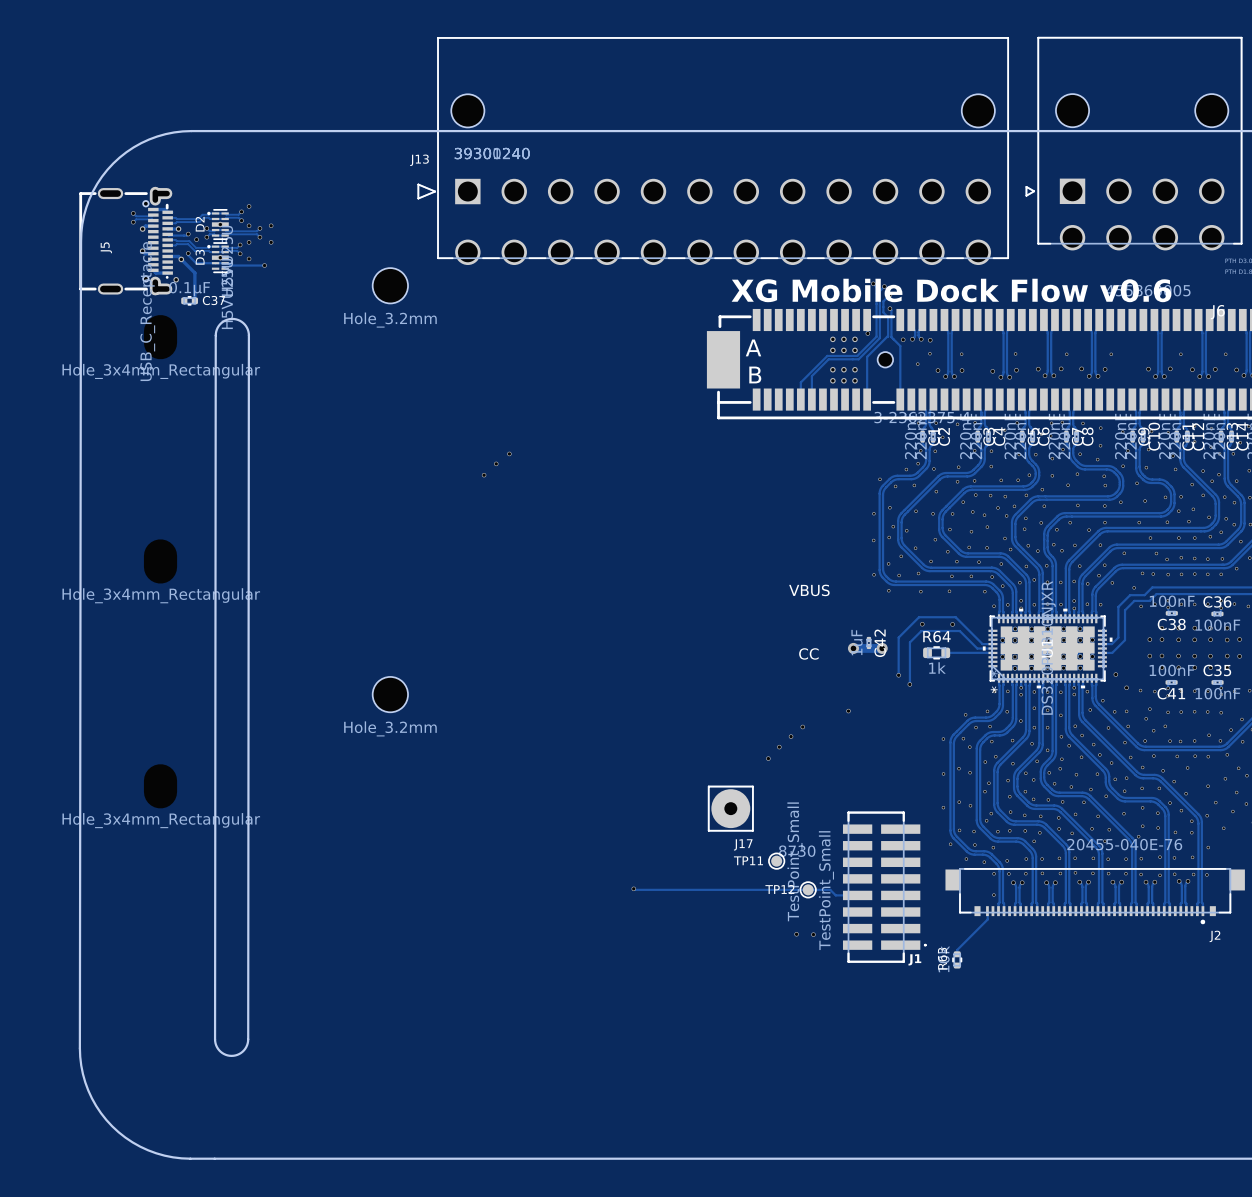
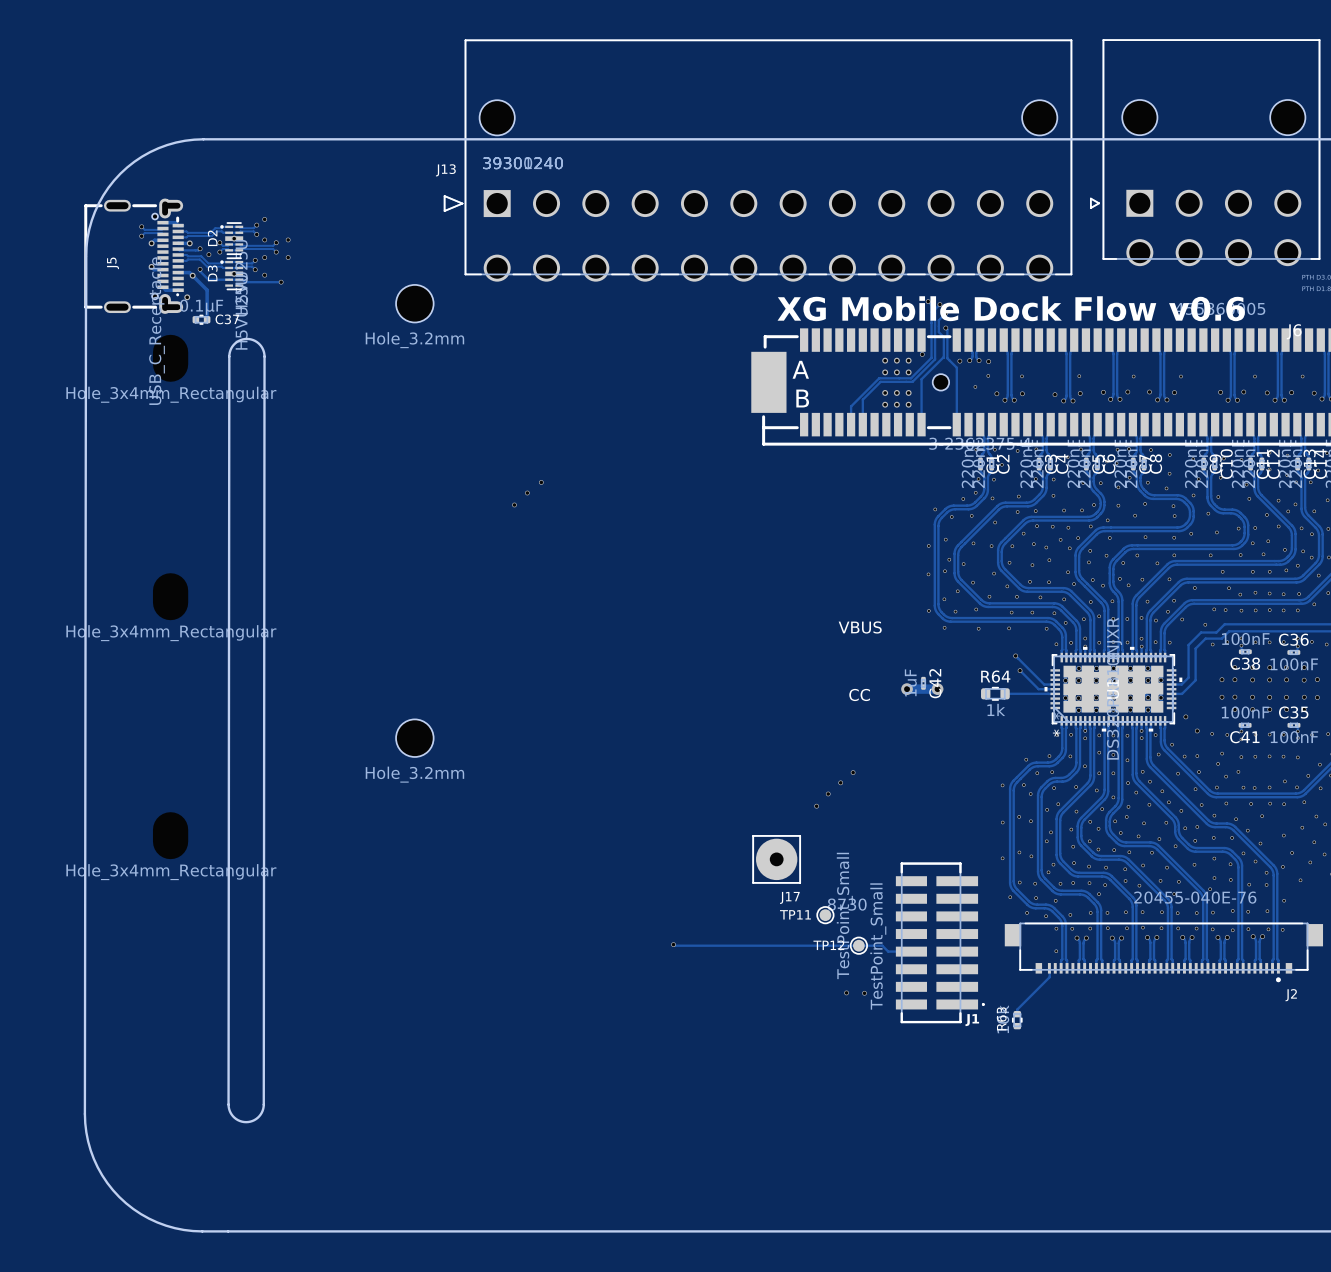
track: (955, 617) (919, 617) (898, 637) (898, 675) -> none
via: none -> (1015, 655)
via: (922, 624) -> none
via: (952, 624) -> none
track: (959, 631) (921, 631) (909, 642) (909, 684) -> none
via: none -> (1020, 670)
via: (898, 675) -> none
via: (909, 684) -> none
via: (848, 711) -> none

